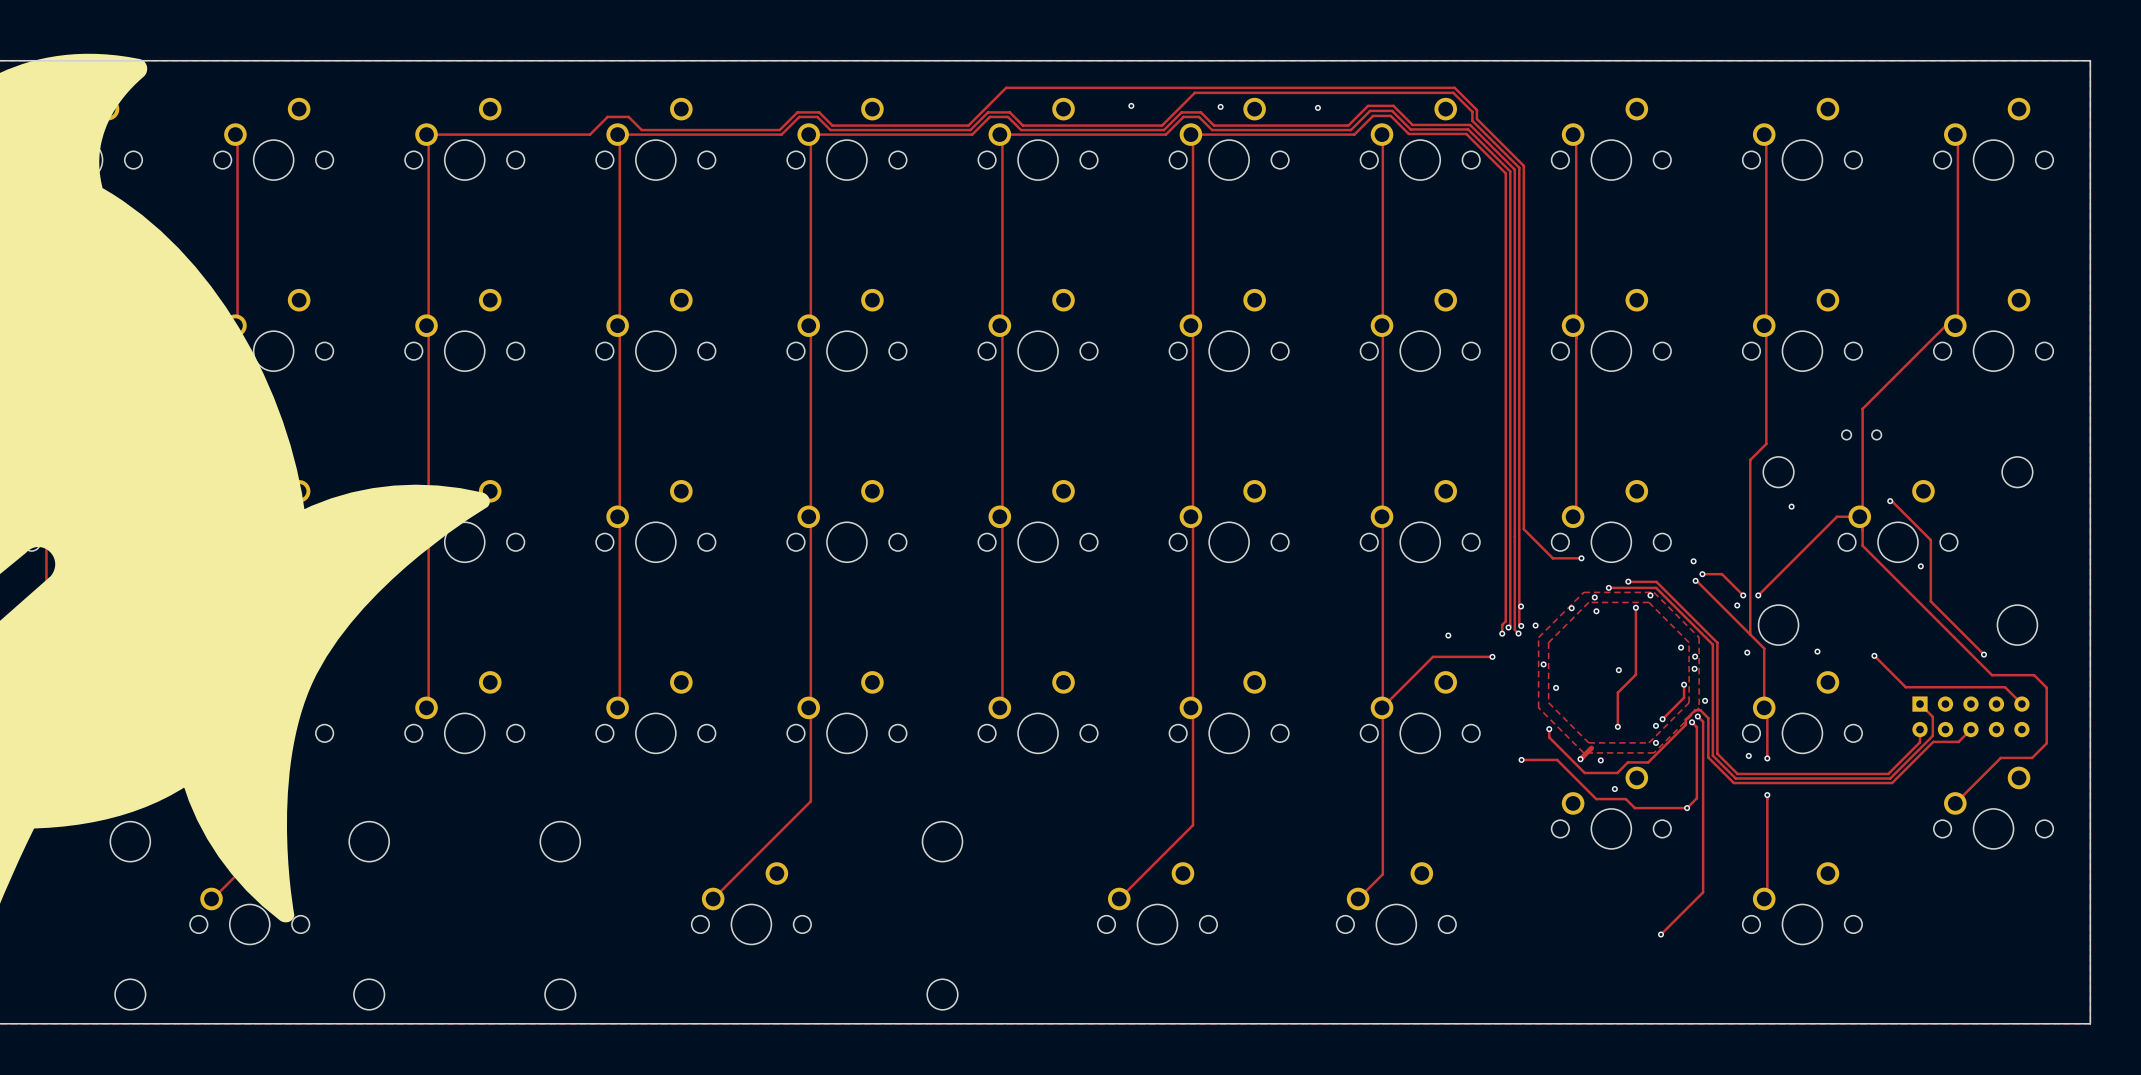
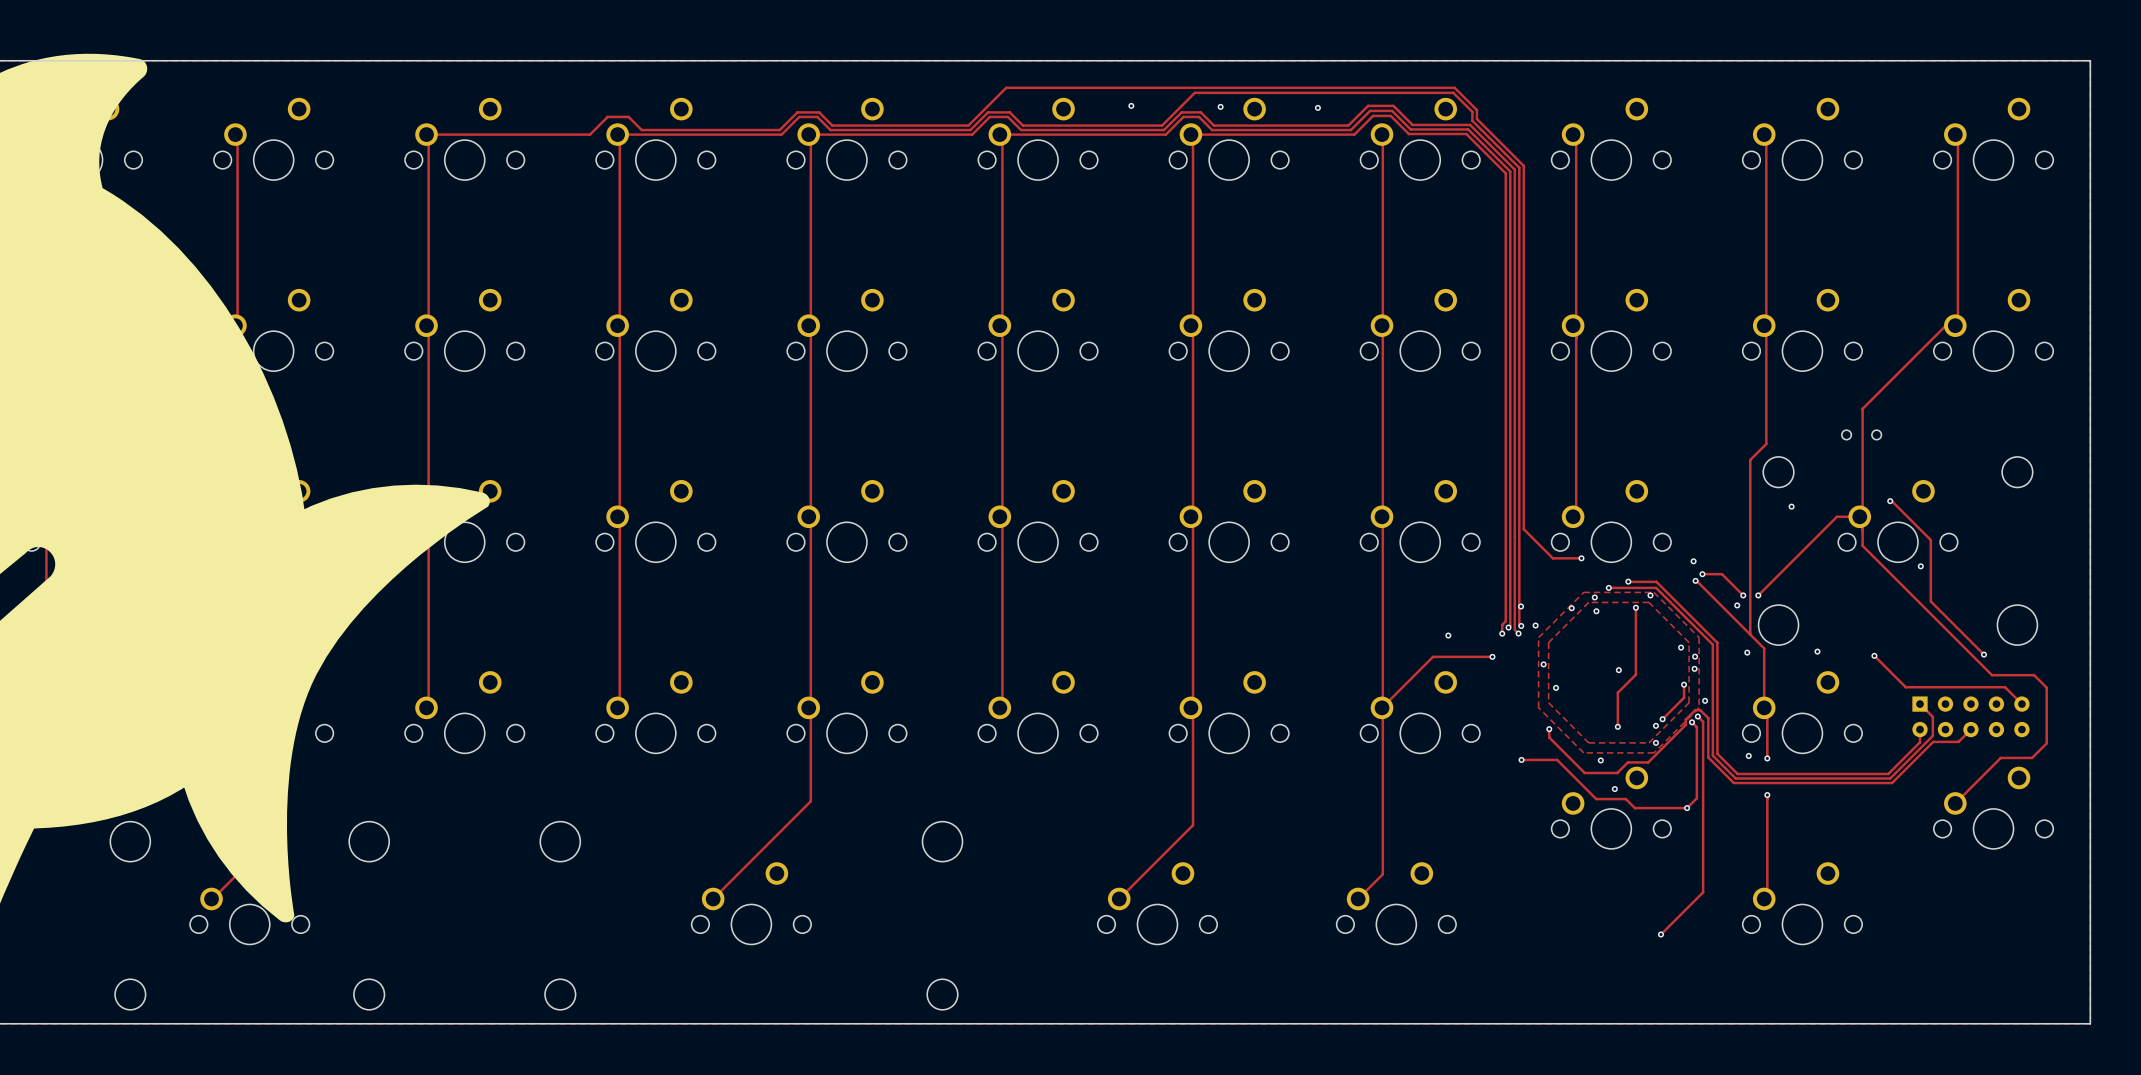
track: (1591, 748) (1580, 759) -> none
via: (1580, 759) -> none

